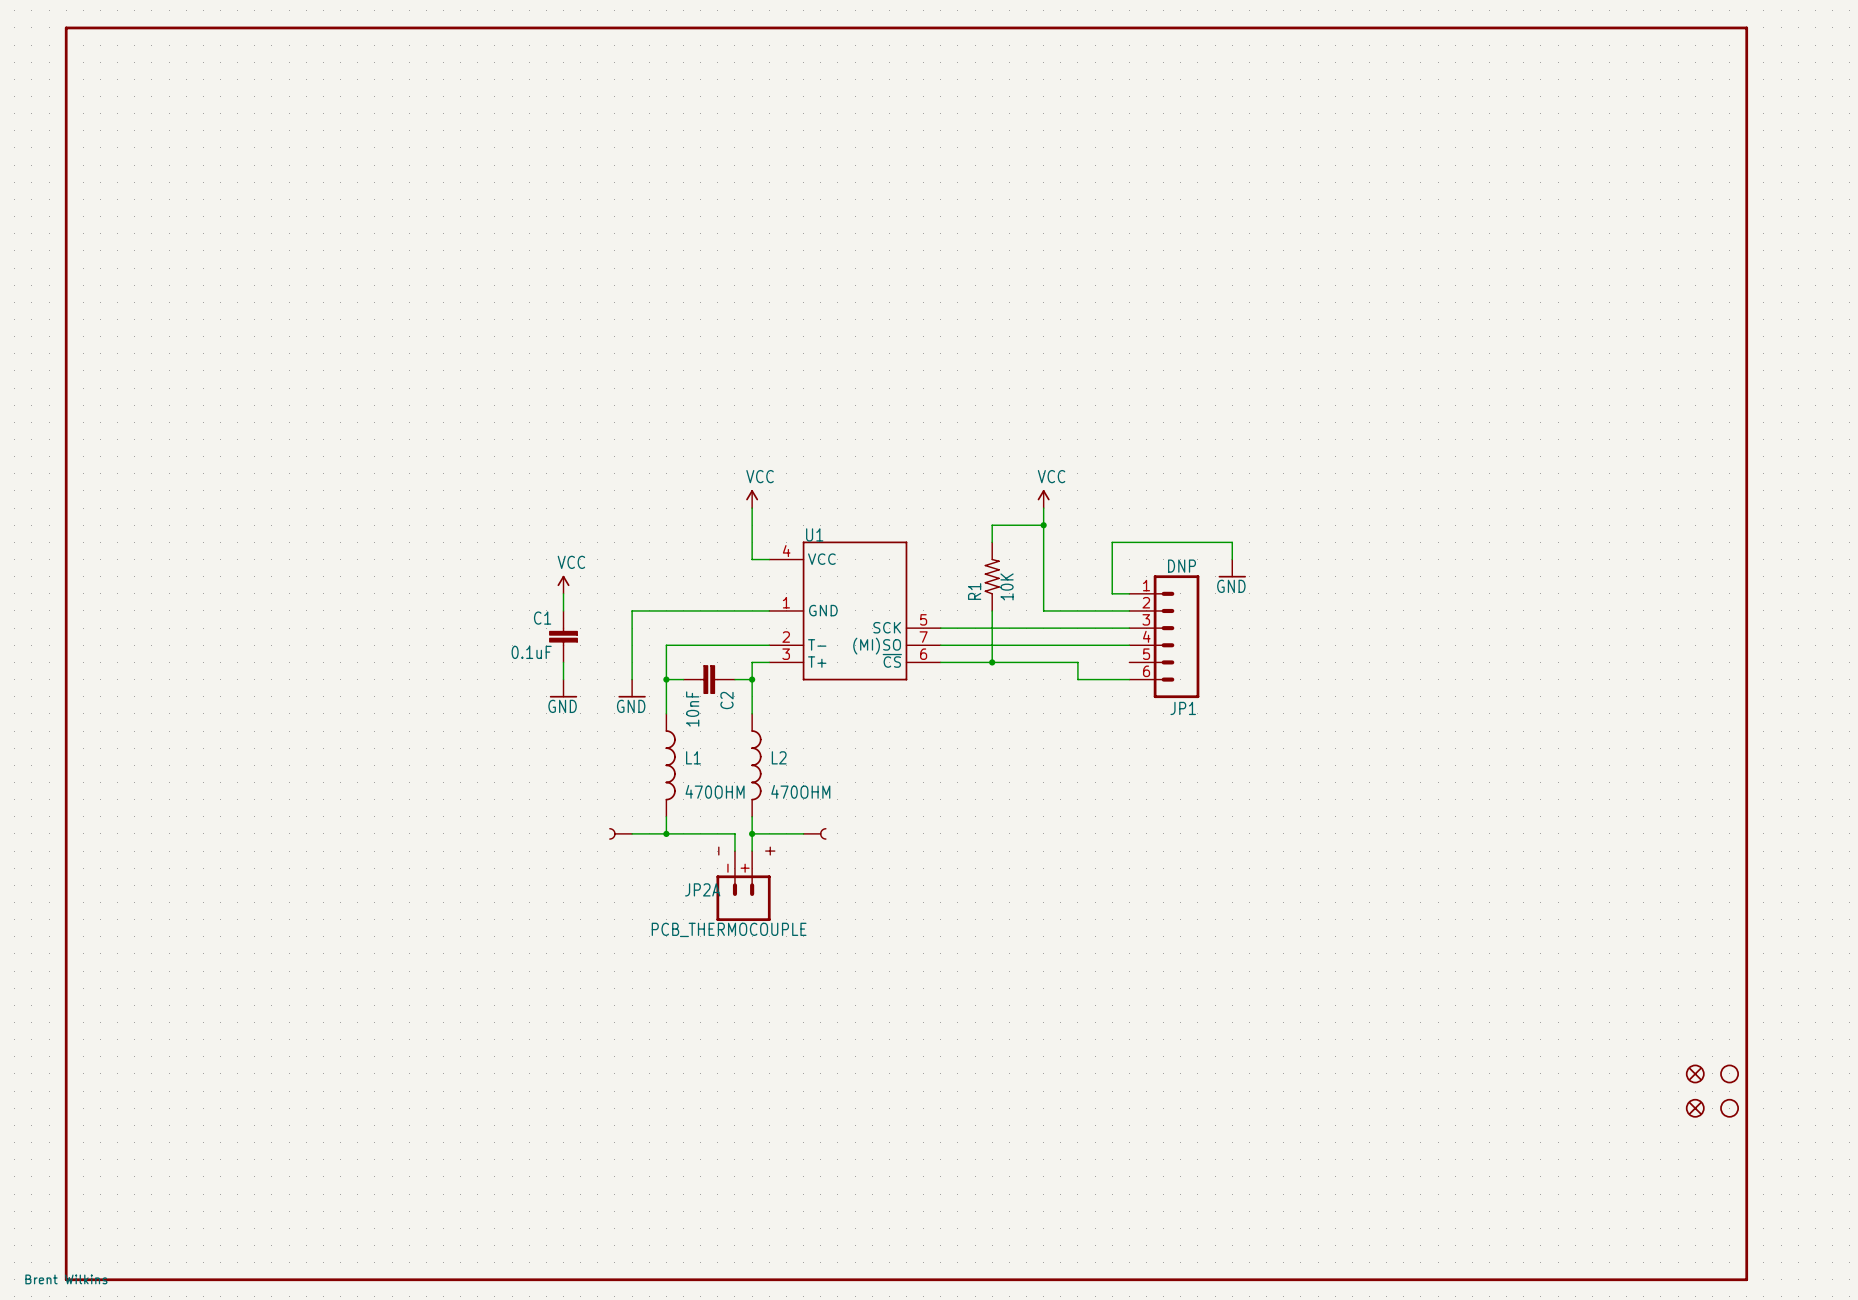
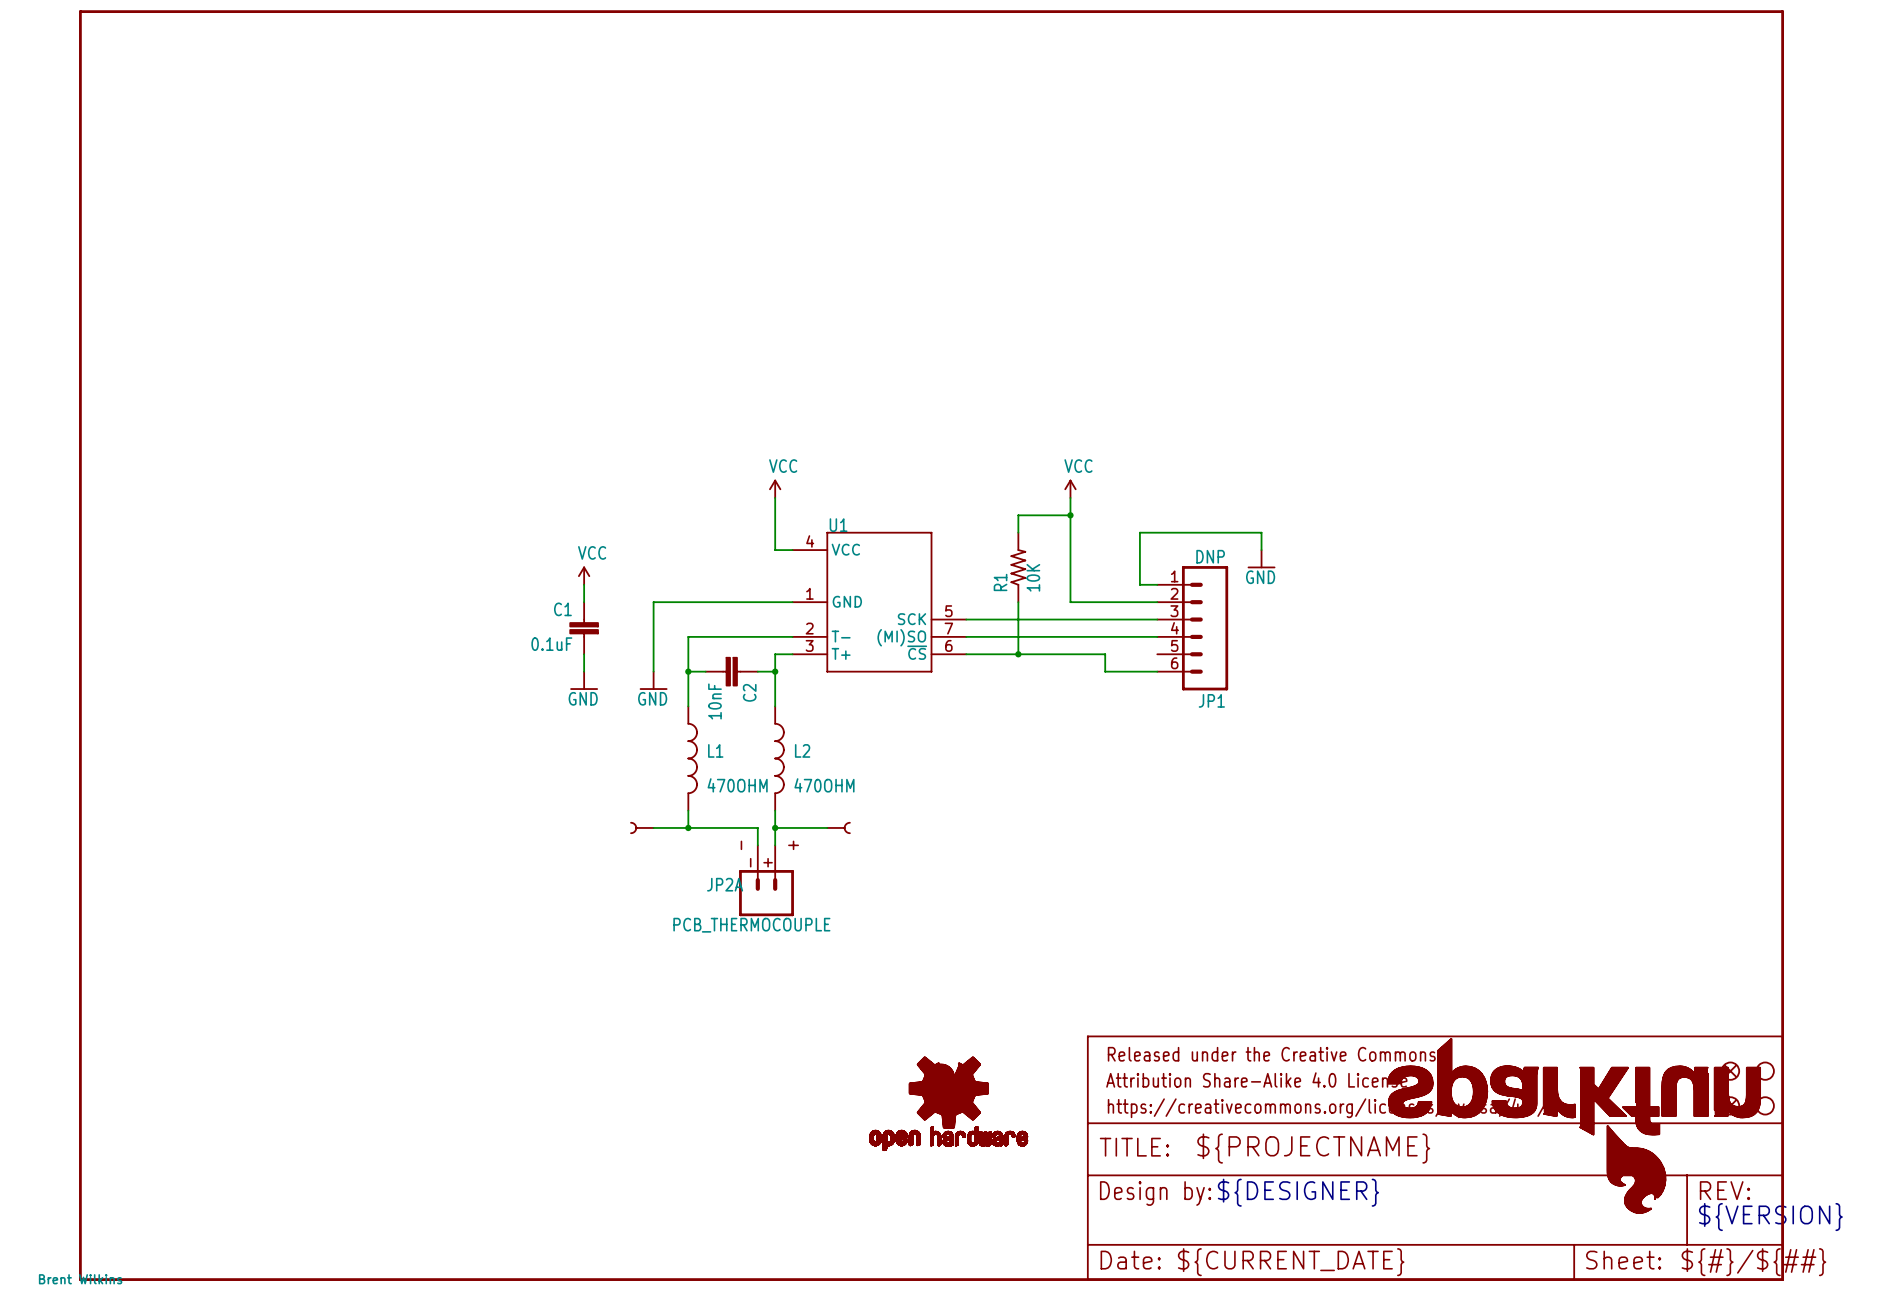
part: none -> (948, 1103)
part: none -> (1574, 1125)
part: none -> (1435, 1158)
text: none -> ${DESIGNER} (1298, 1192)
text: none -> ${VERSION} (1770, 1217)

